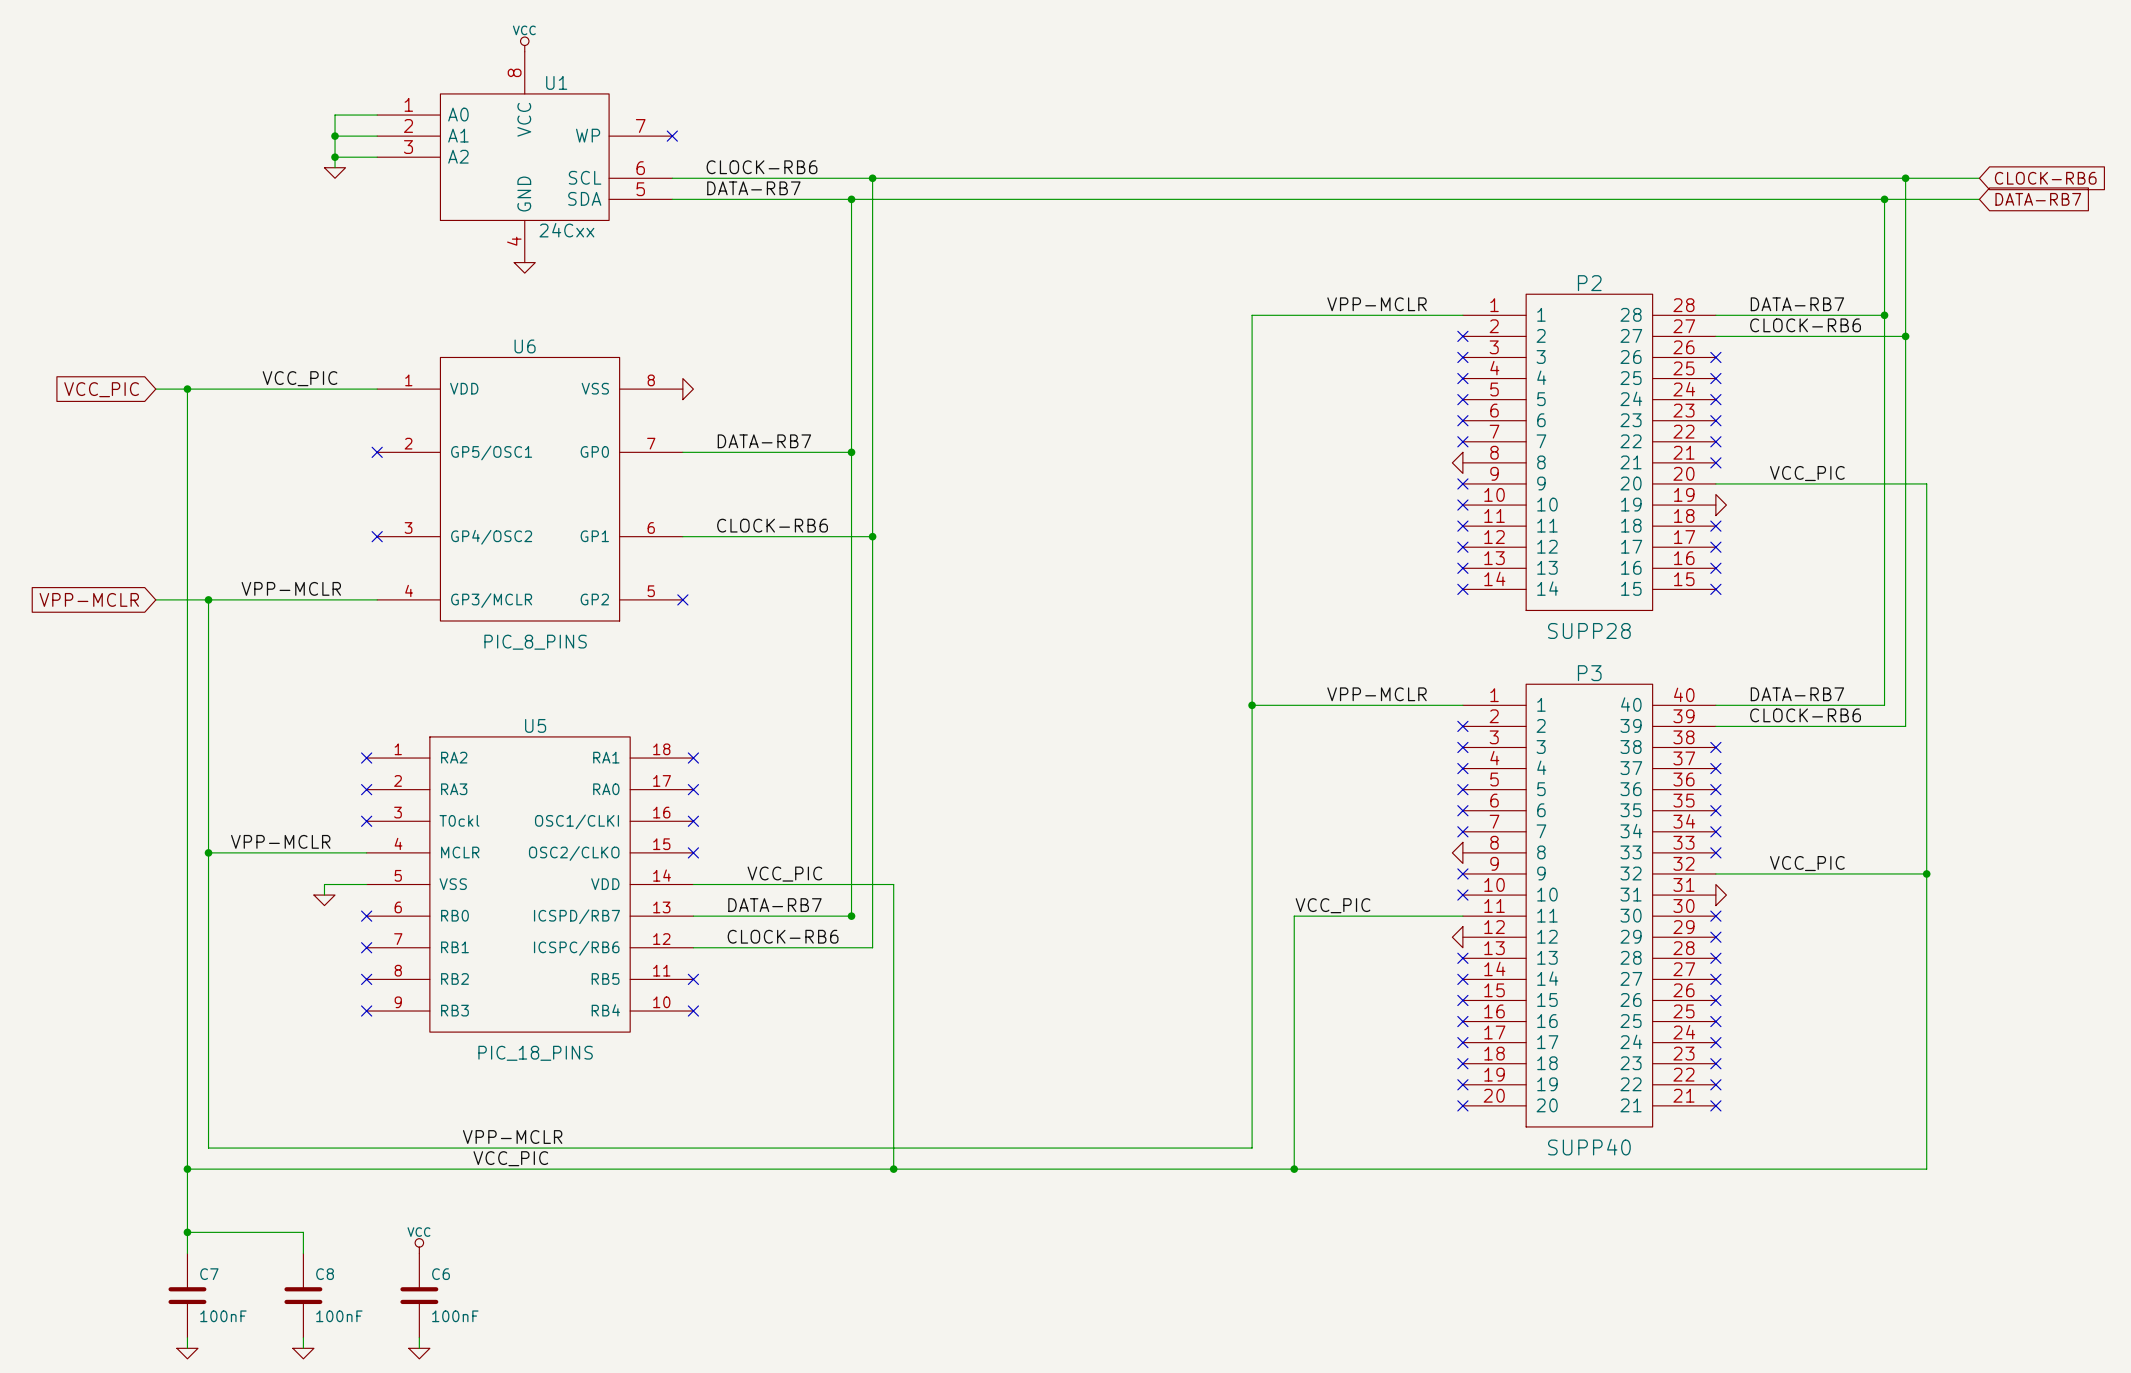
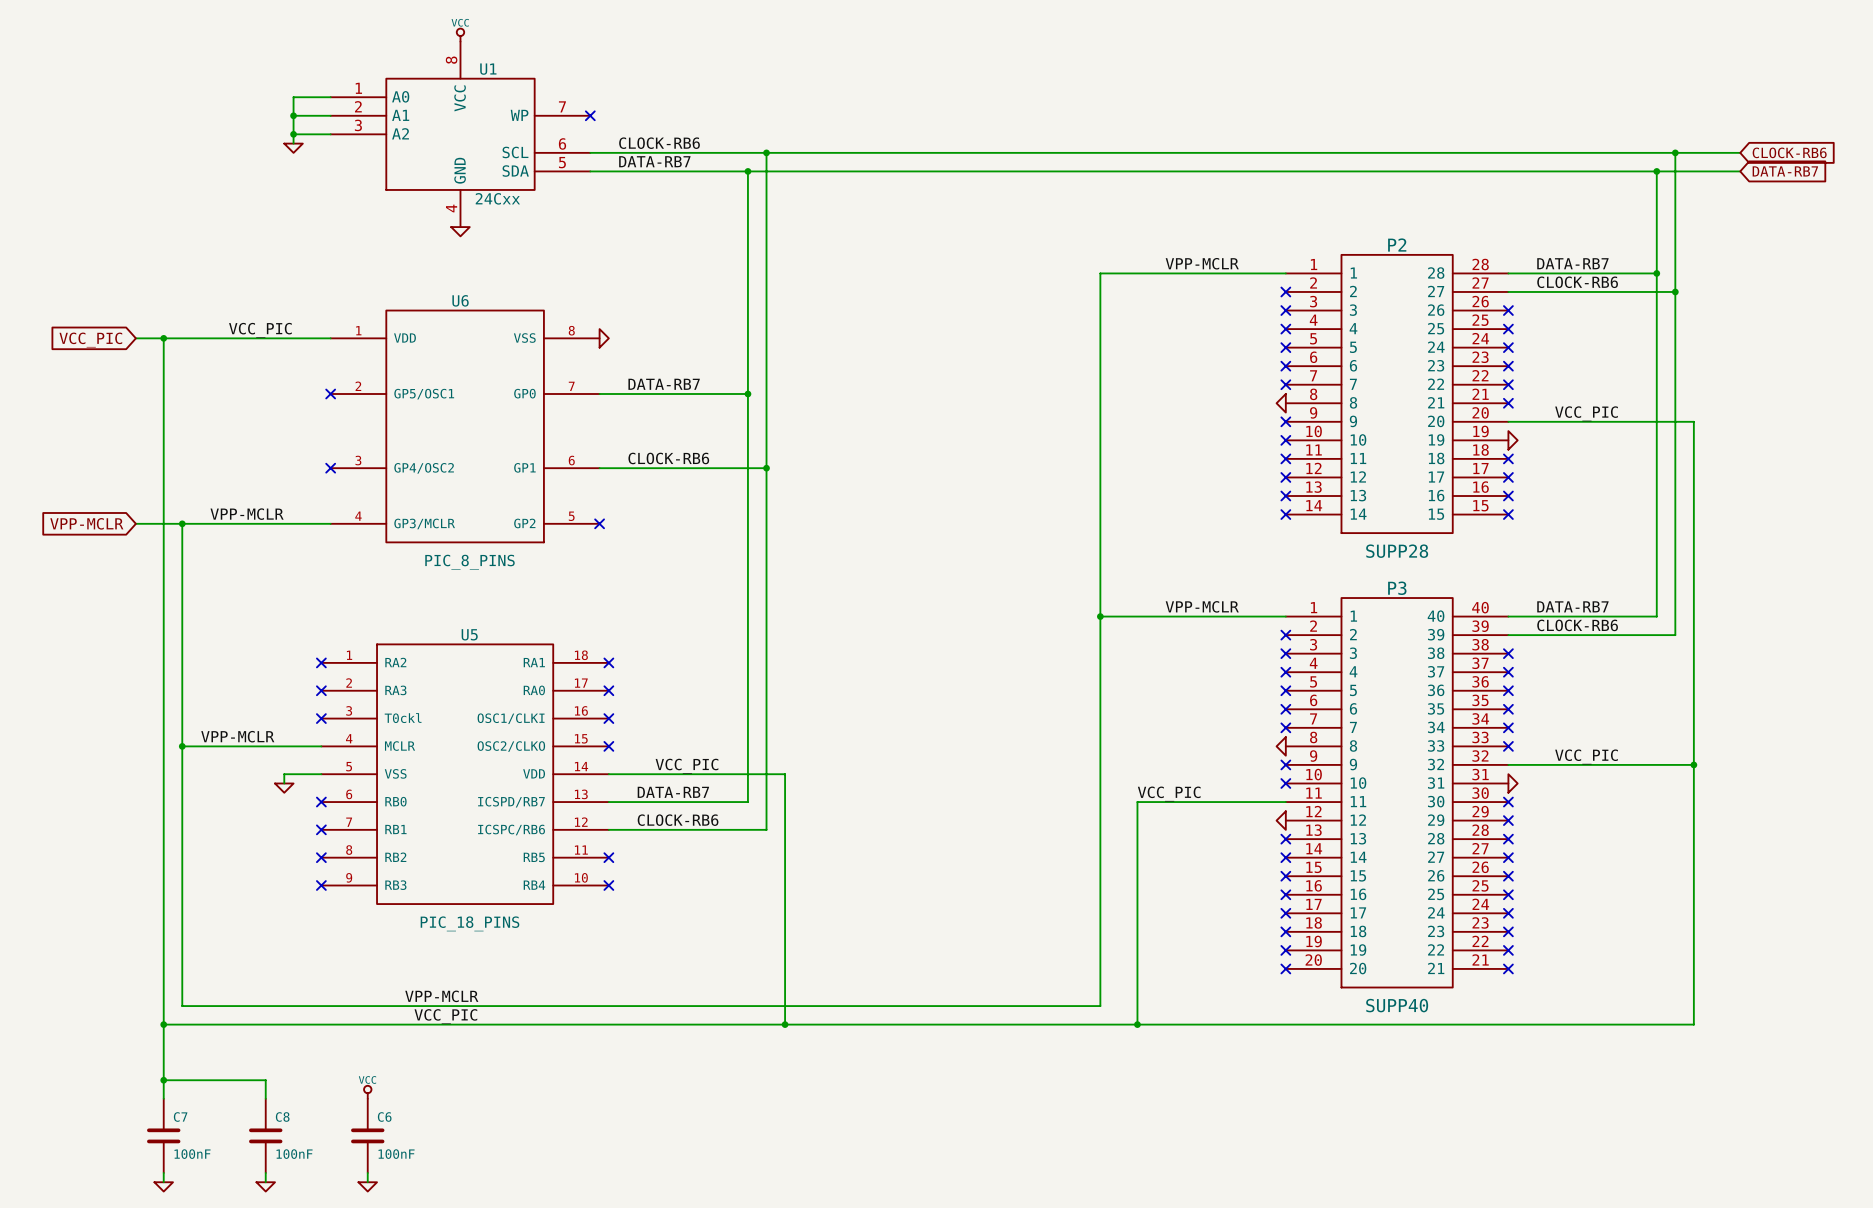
junction: (851, 916) -> none

